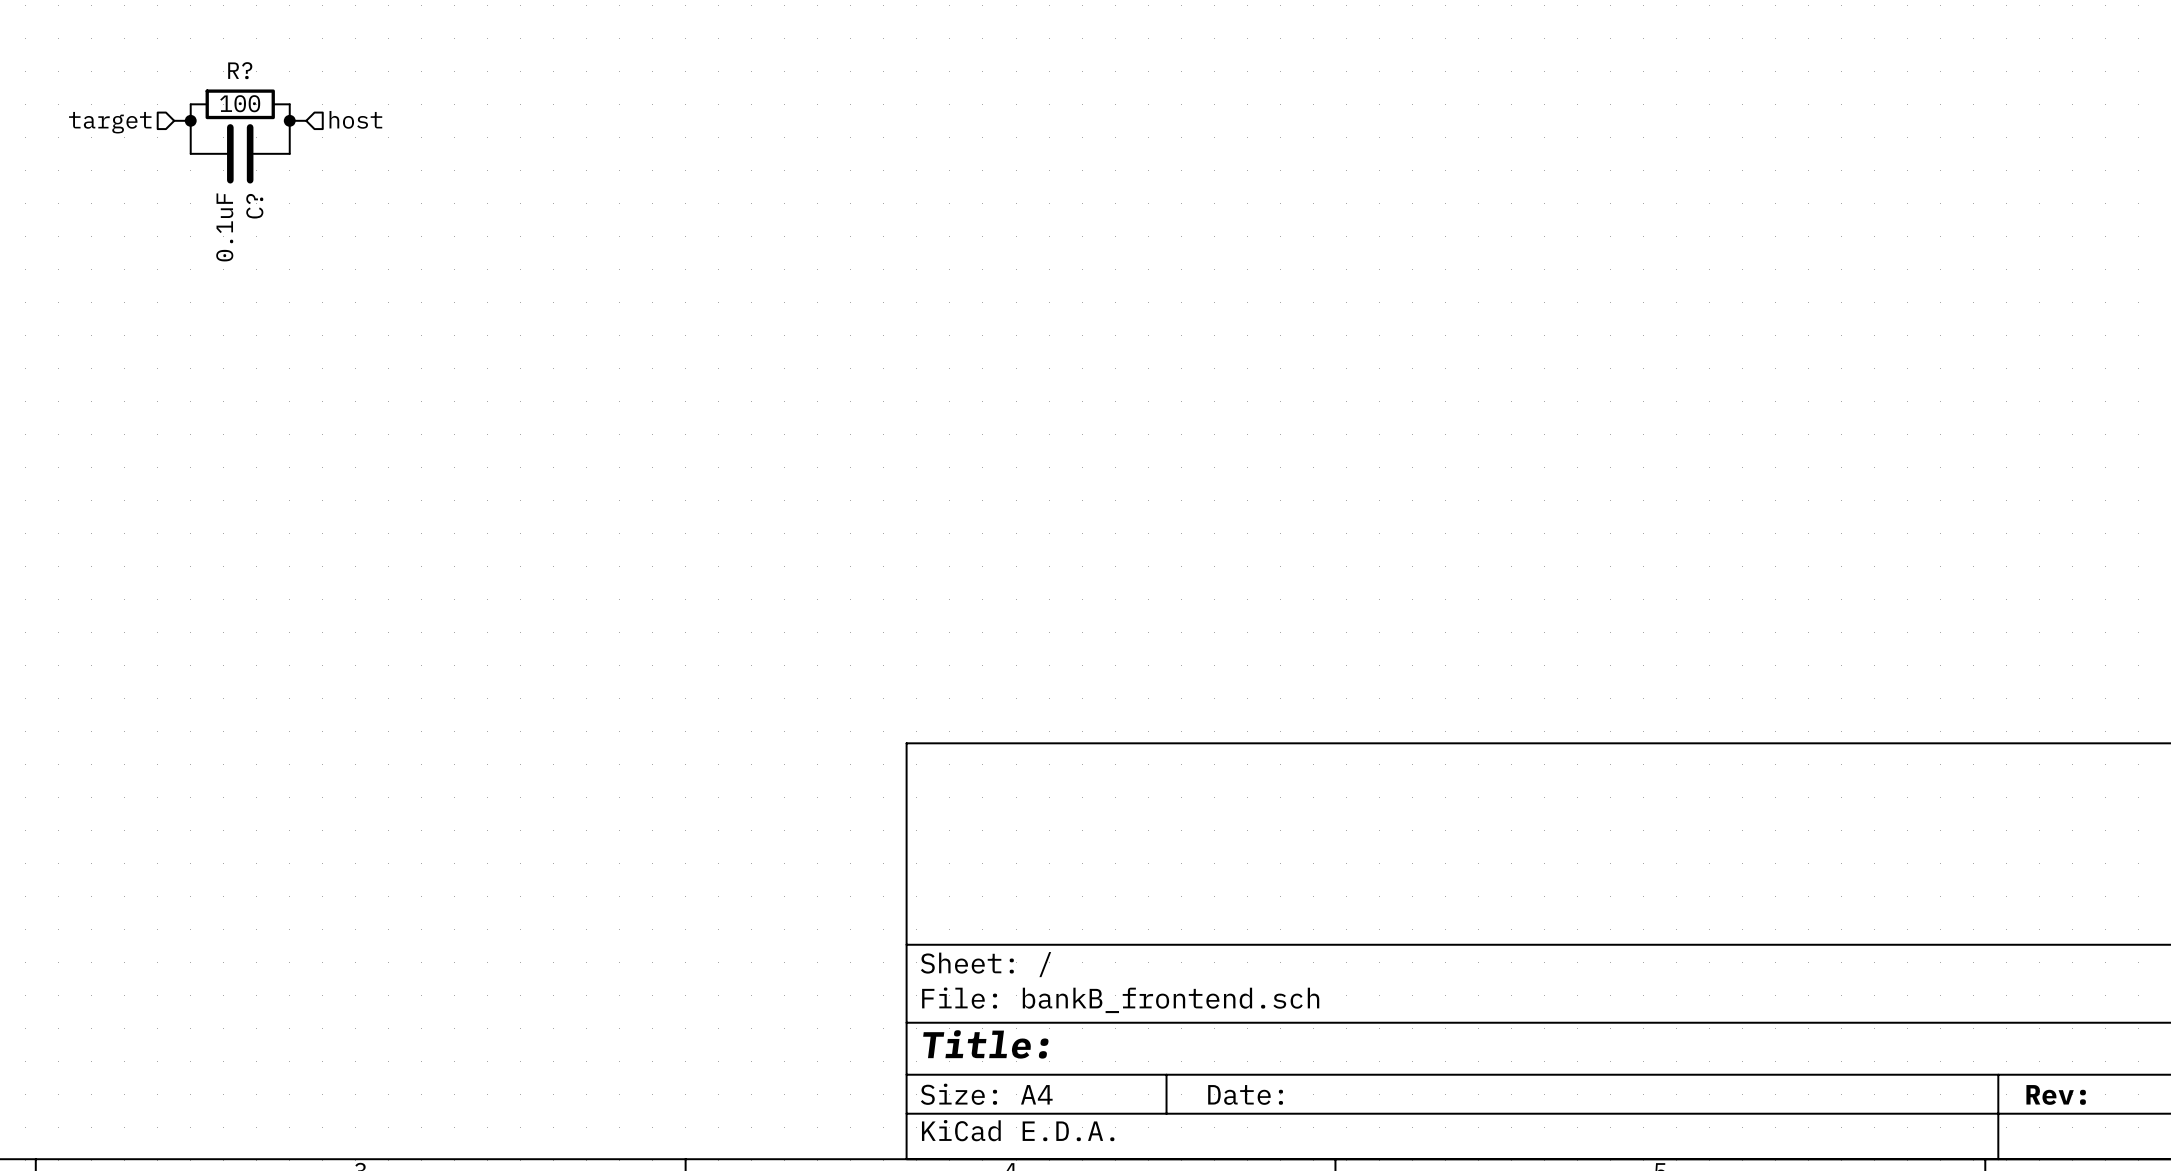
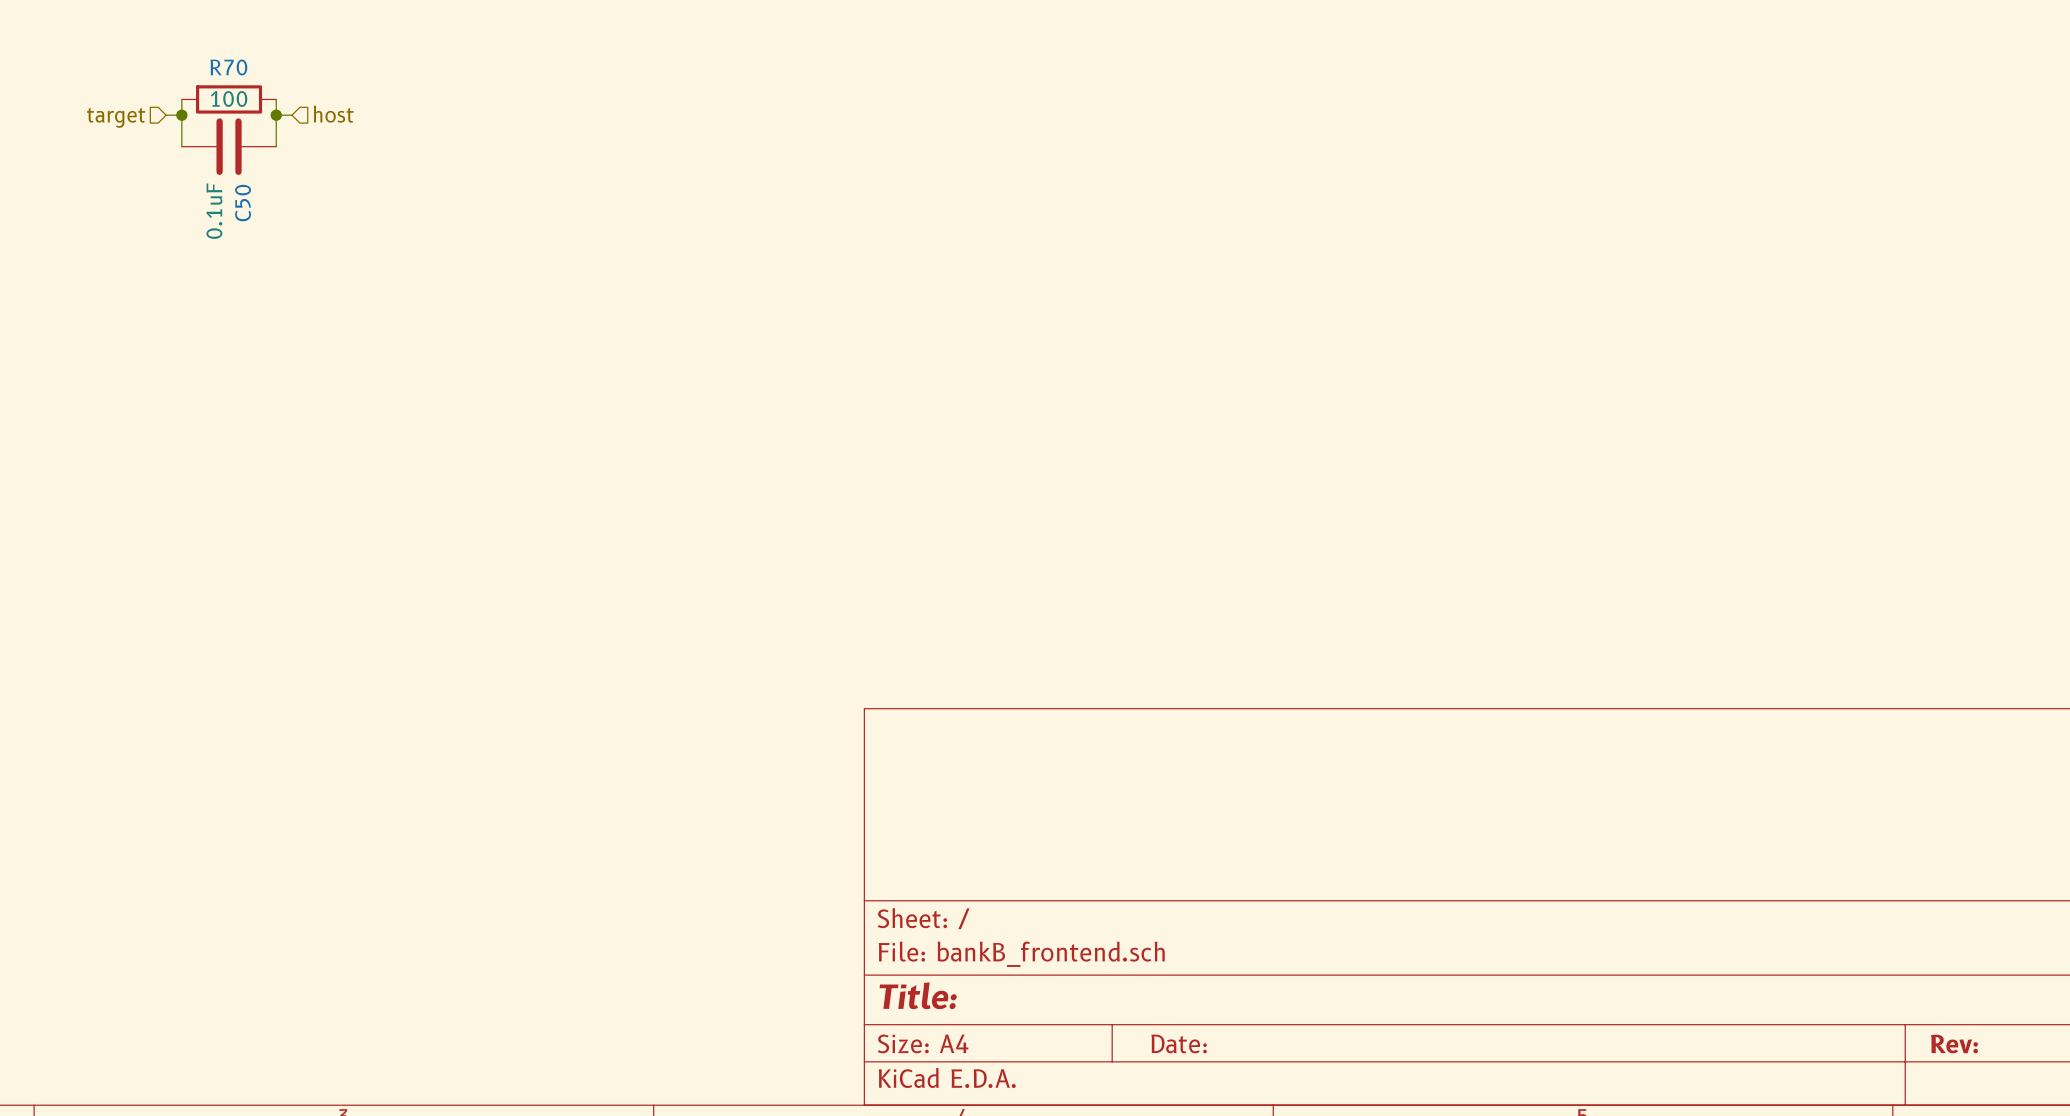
R? name: R? (240, 70) -> R70 (228, 67)
C? name: C? (254, 206) -> C50 (243, 203)

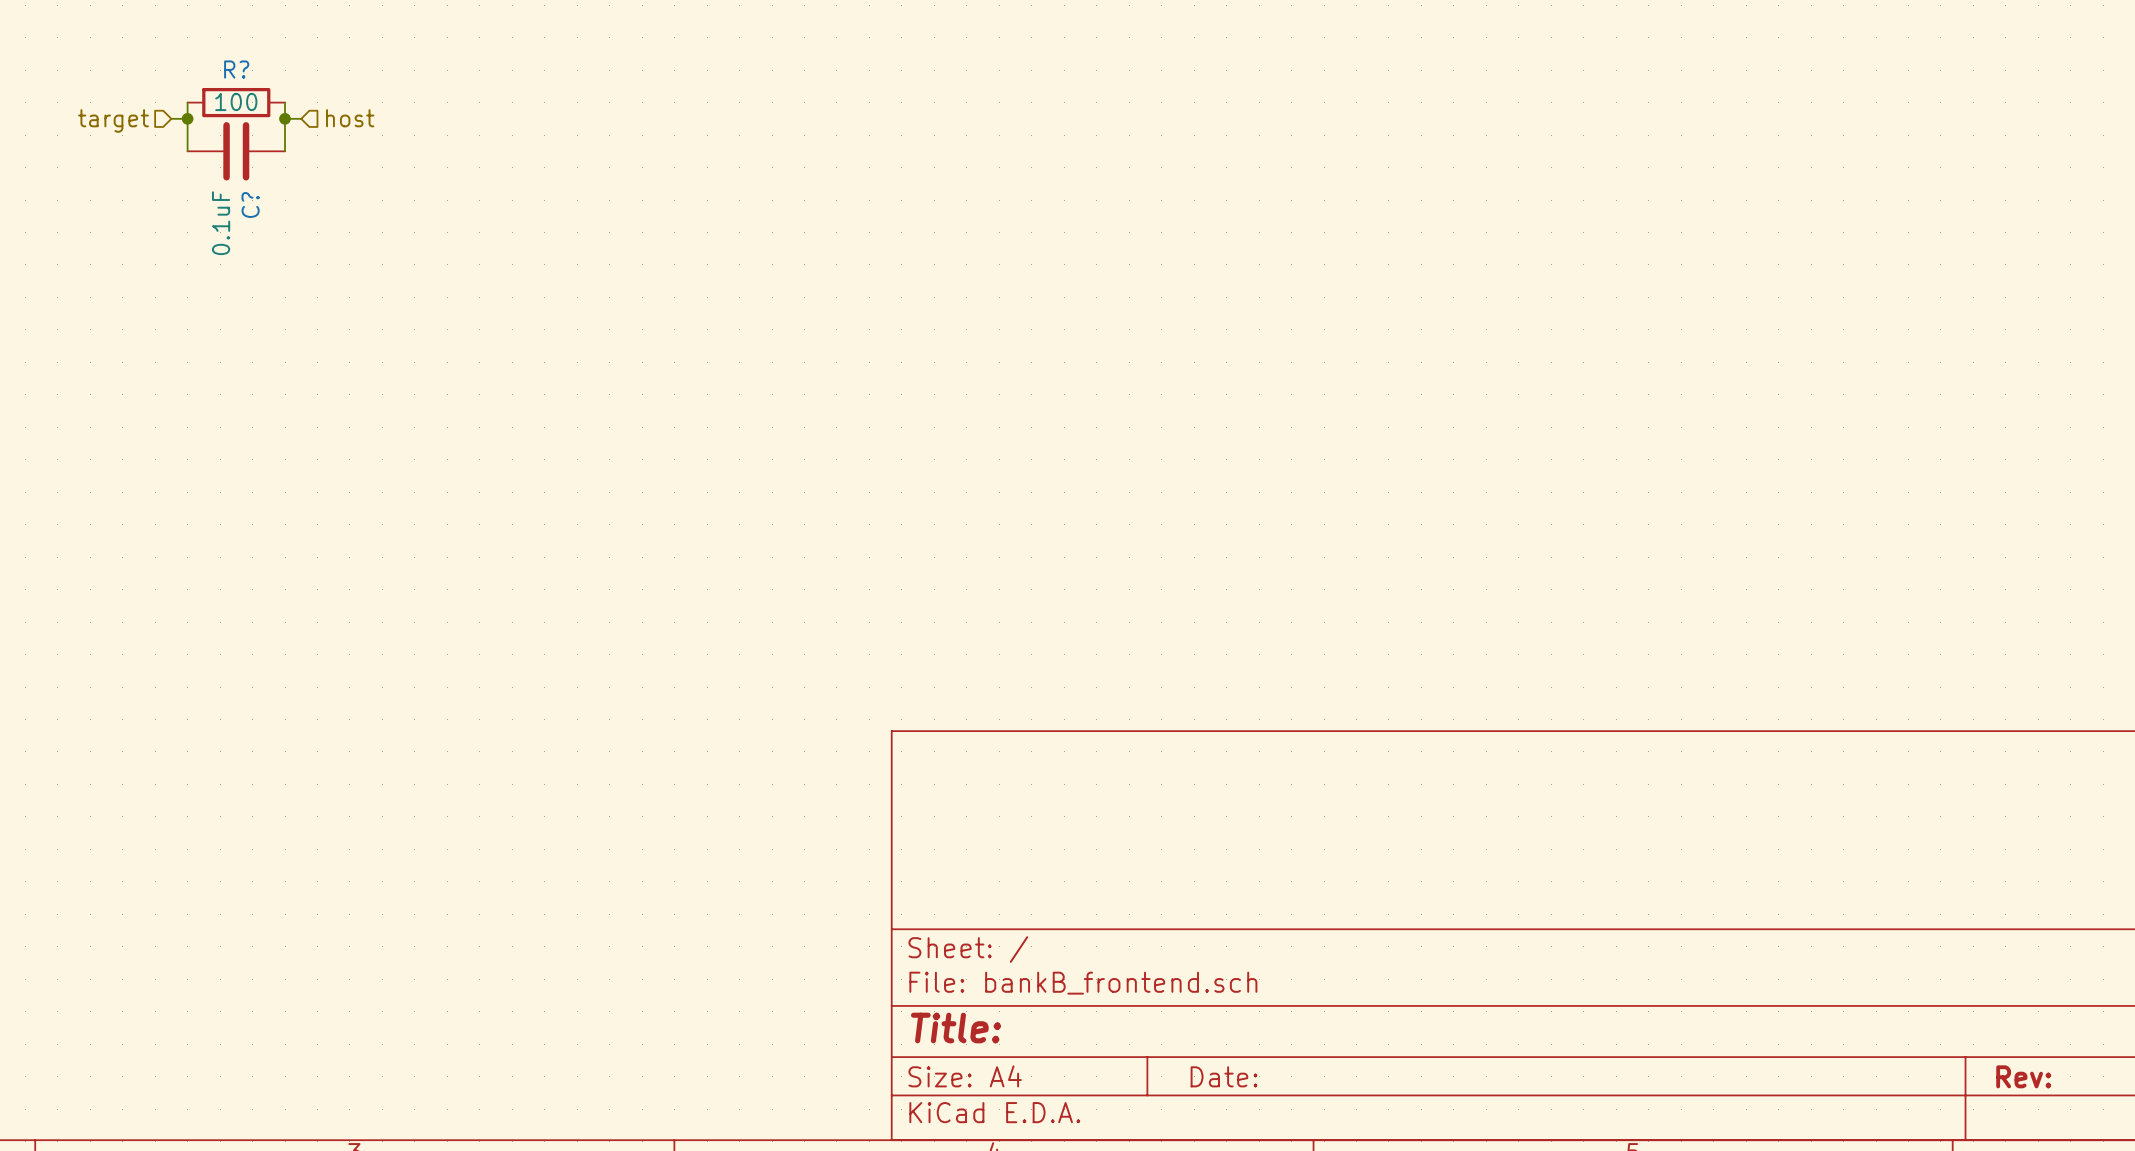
R70 name: R70 (228, 67) -> R? (236, 69)
C50 name: C50 (243, 203) -> C? (250, 205)

